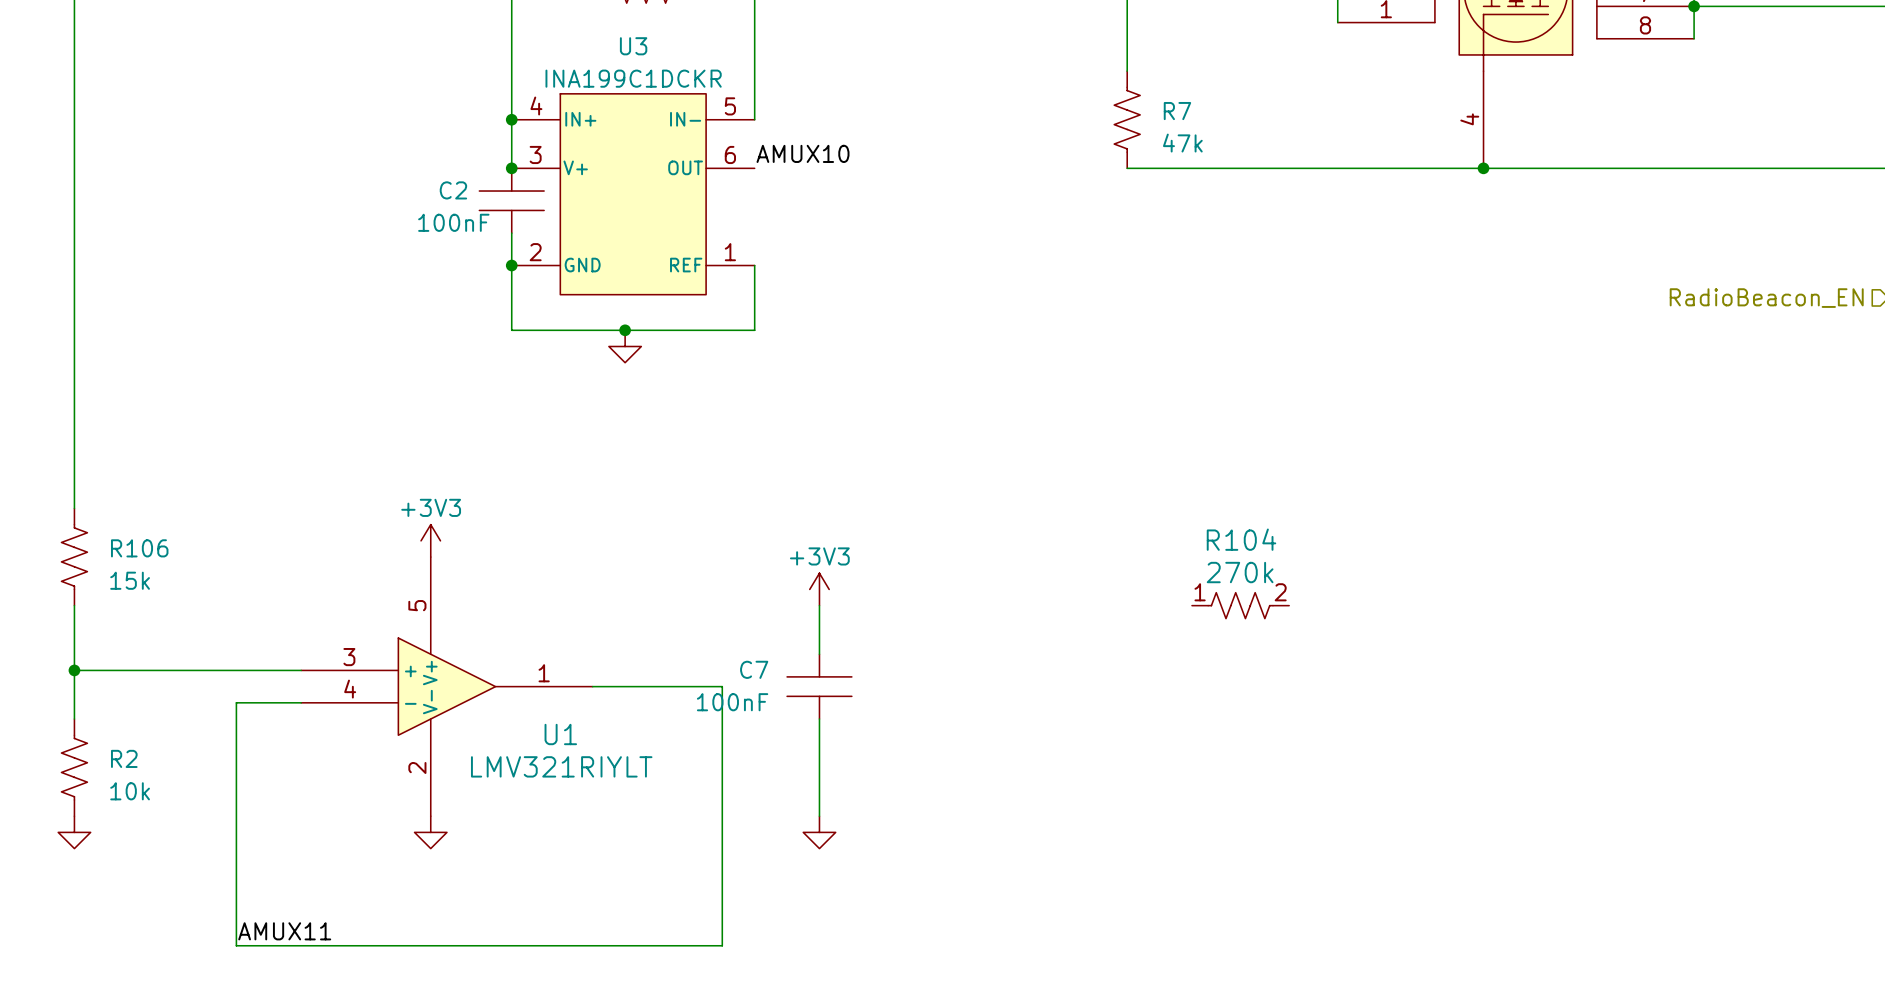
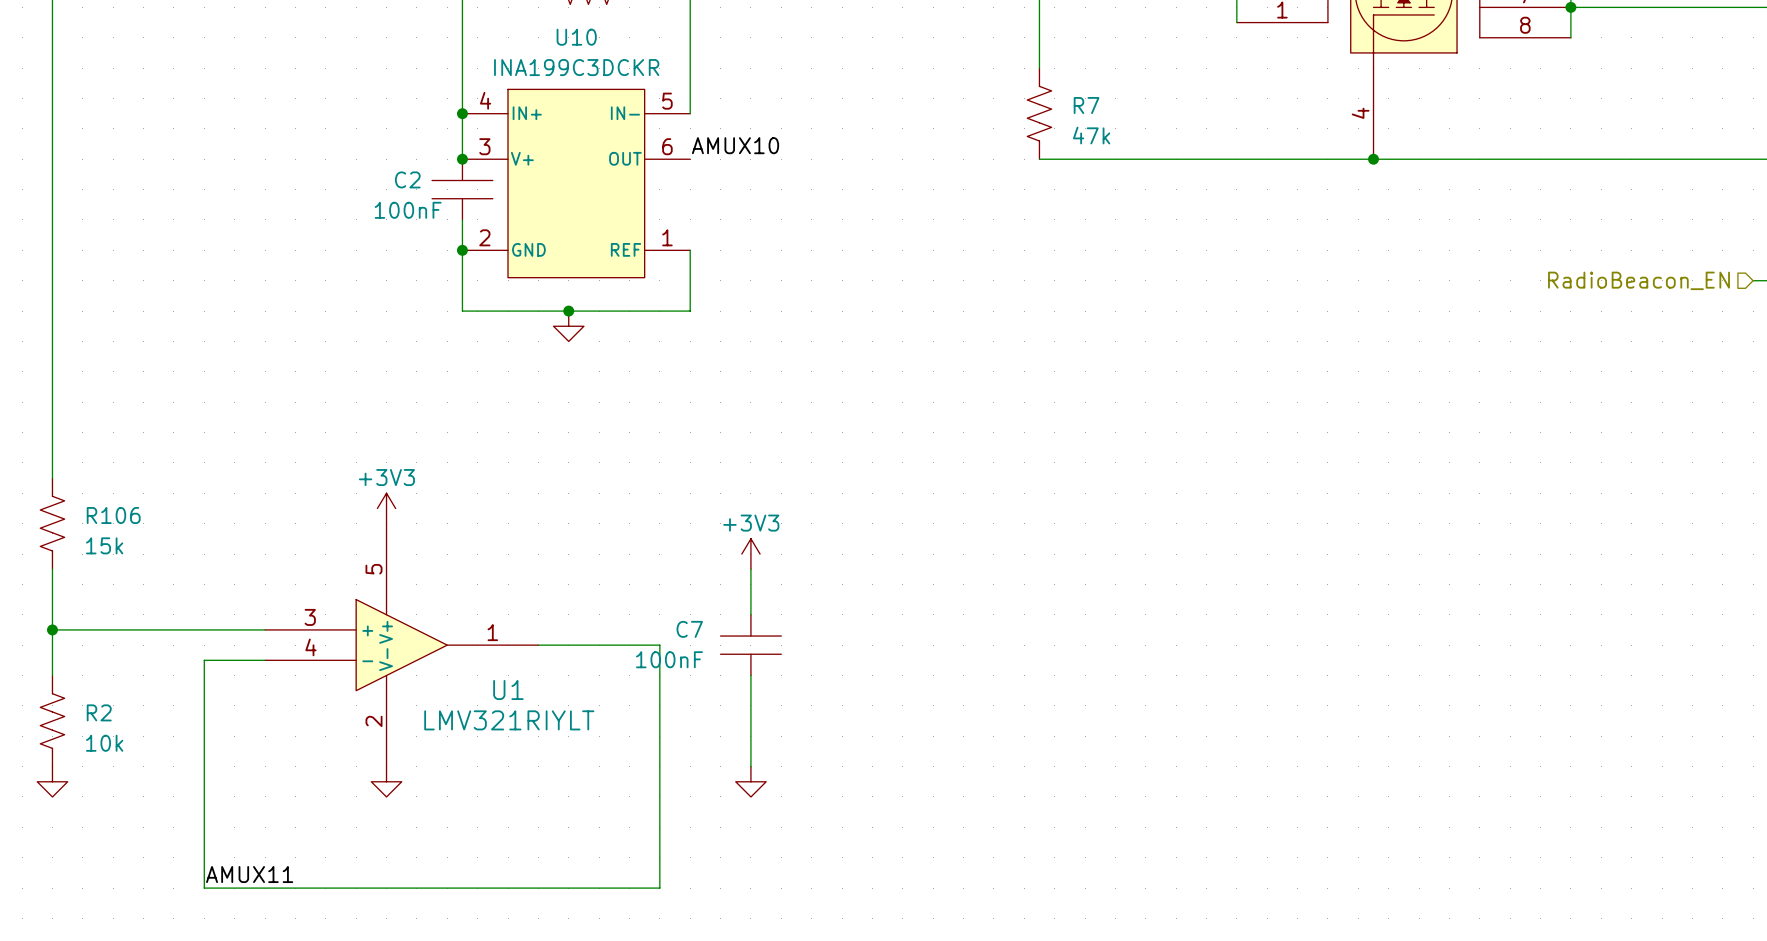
U3 name: U3 (633, 46) -> U10 (576, 37)
U3 value: INA199C1DCKR (633, 78) -> INA199C3DCKR (576, 67)
R104: 270k (1240, 605) -> none

